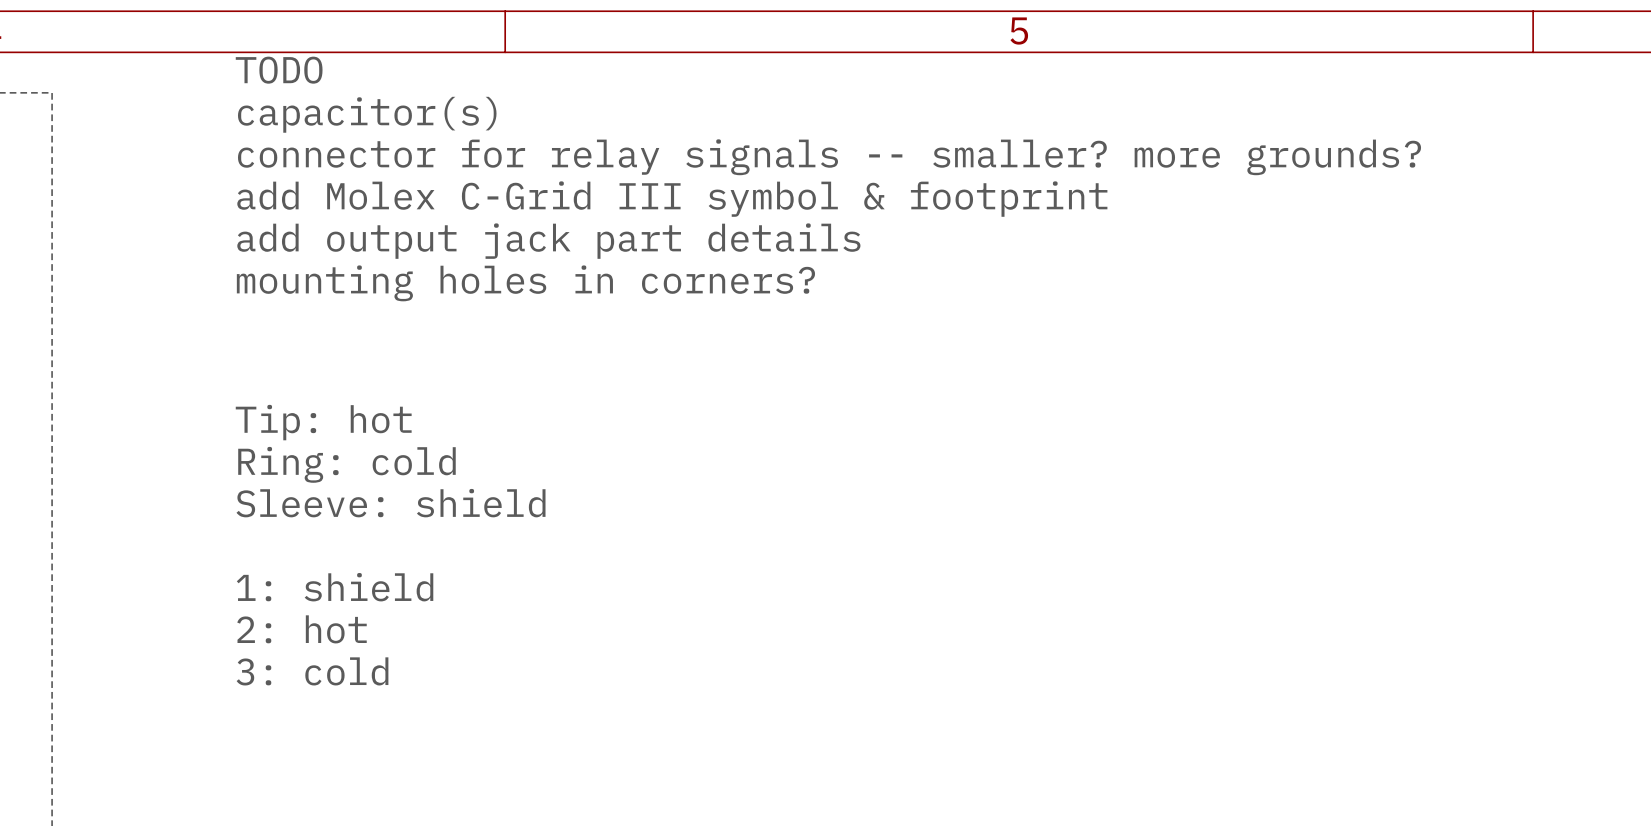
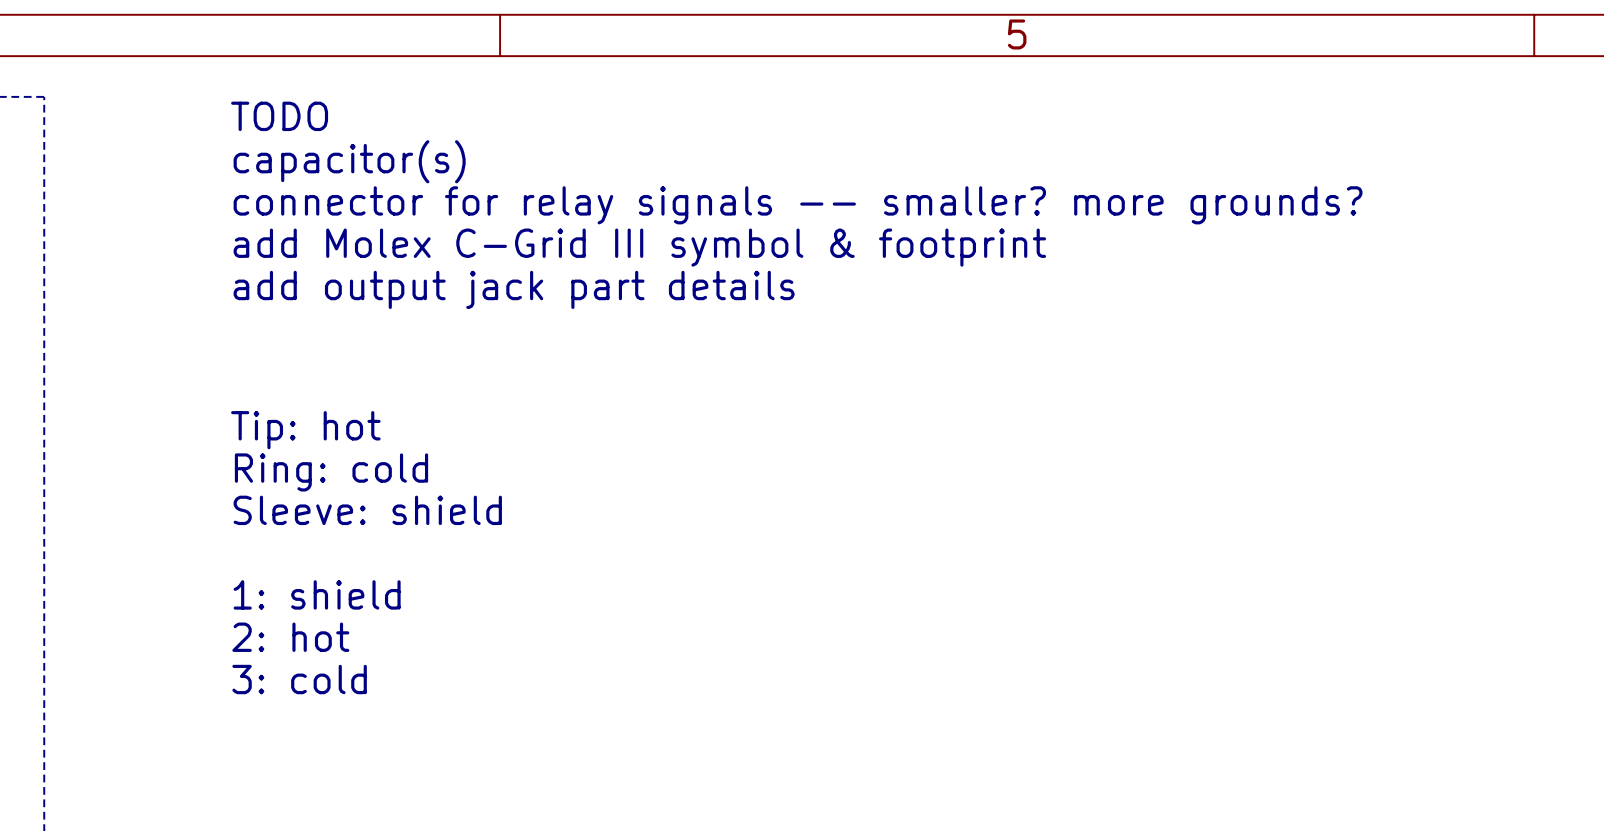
text: TODO (279, 70) -> none
text: capacitor(s) (367, 114) -> TODO (279, 116)
text: connector for relay signals -- smaller? more grounds? (829, 157) -> capacitor(s) (349, 161)
text: add Molex C-Grid III symbol & footprint (672, 199) -> connector for relay signals -- smaller? more grounds? (798, 205)
text: add output jack part details (548, 241) -> add Molex C-Grid III symbol & footprint (639, 247)
text: mounting holes in corners? (525, 283) -> add output jack part details (514, 289)

